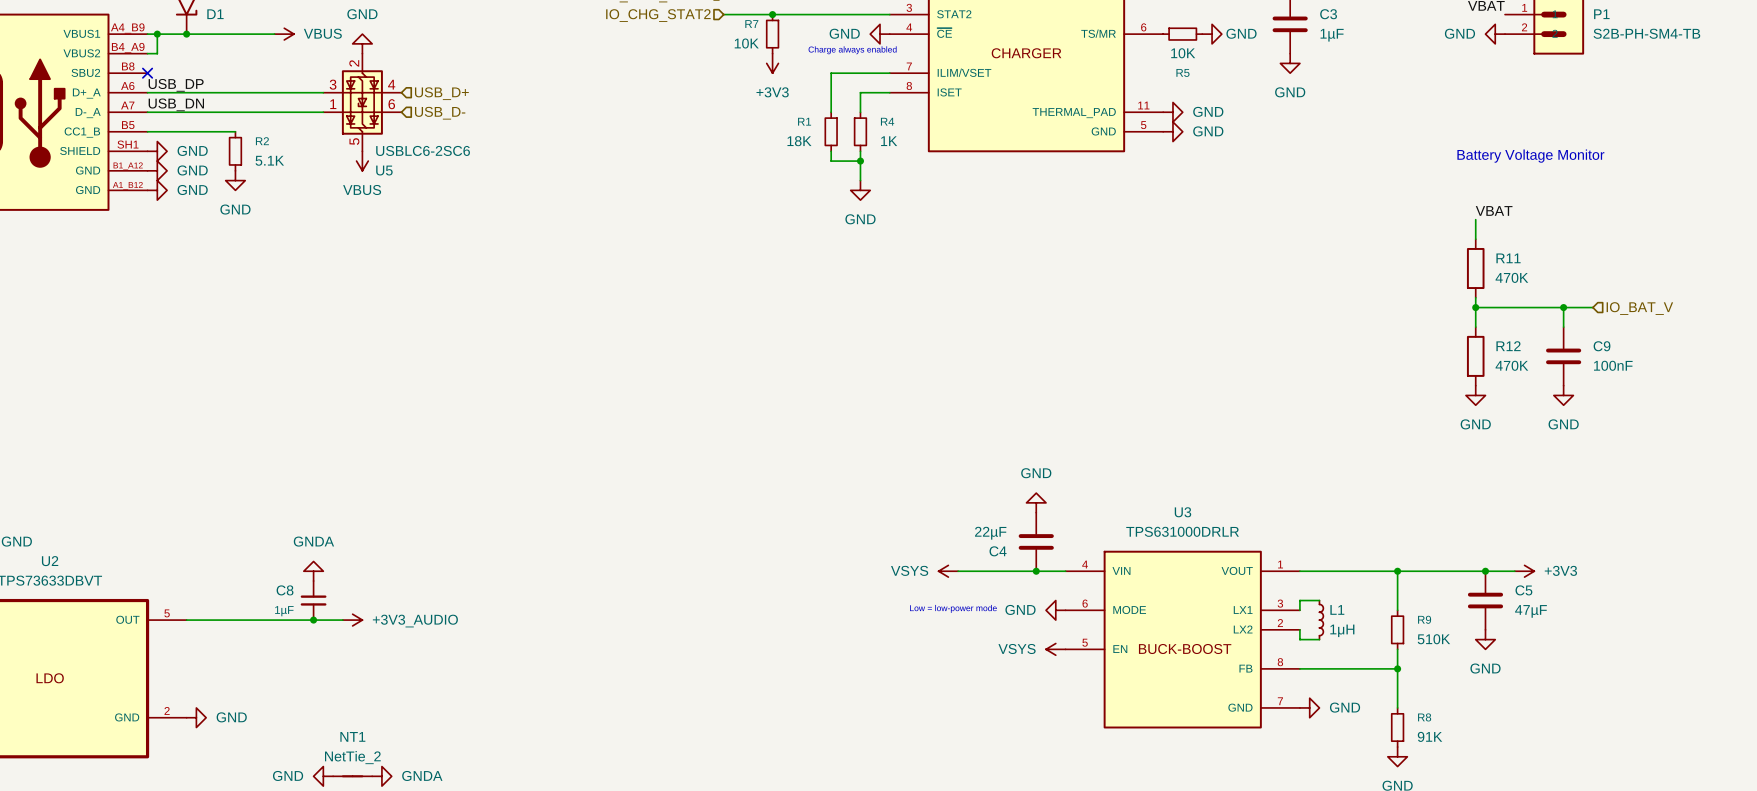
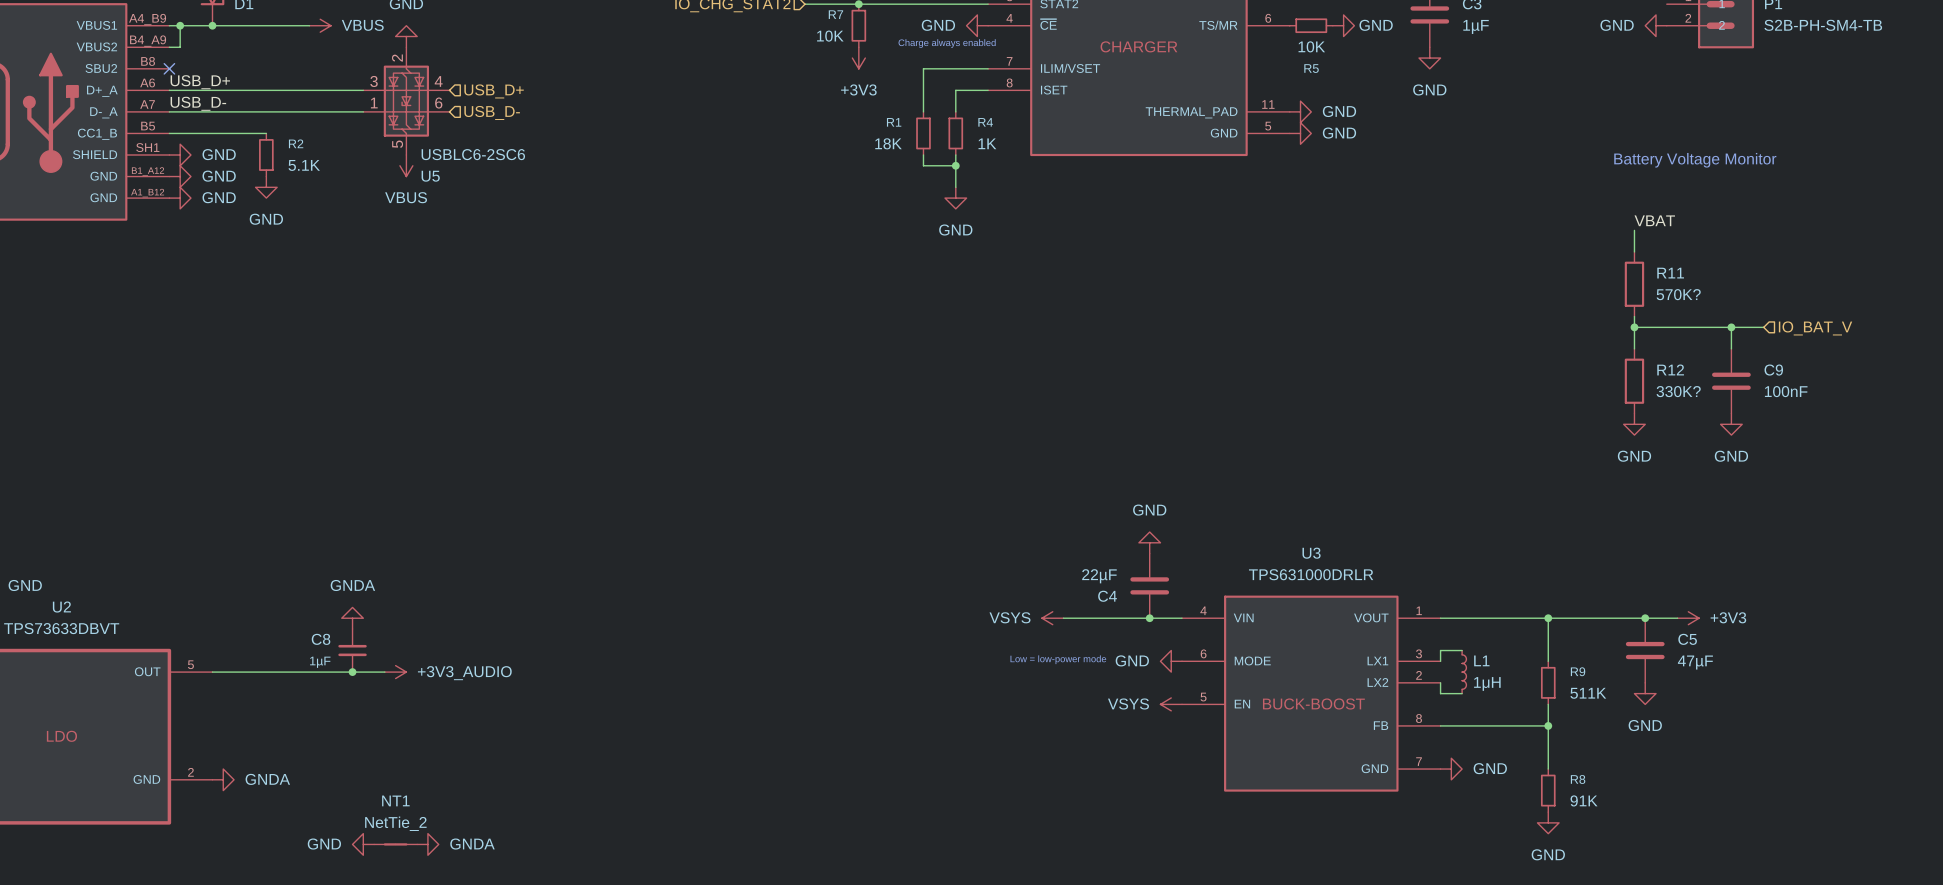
label: USB_DP (176, 85) -> USB_D+ (200, 82)
label: USB_DN (176, 104) -> USB_D- (198, 103)
R11 value: 470K (1511, 277) -> 570K? (1678, 294)
R12 value: 470K (1511, 365) -> 330K? (1678, 391)
R9 value: 510K (1433, 639) -> 511K (1588, 693)
power symbol: GND (196, 717) -> GNDA (223, 779)

